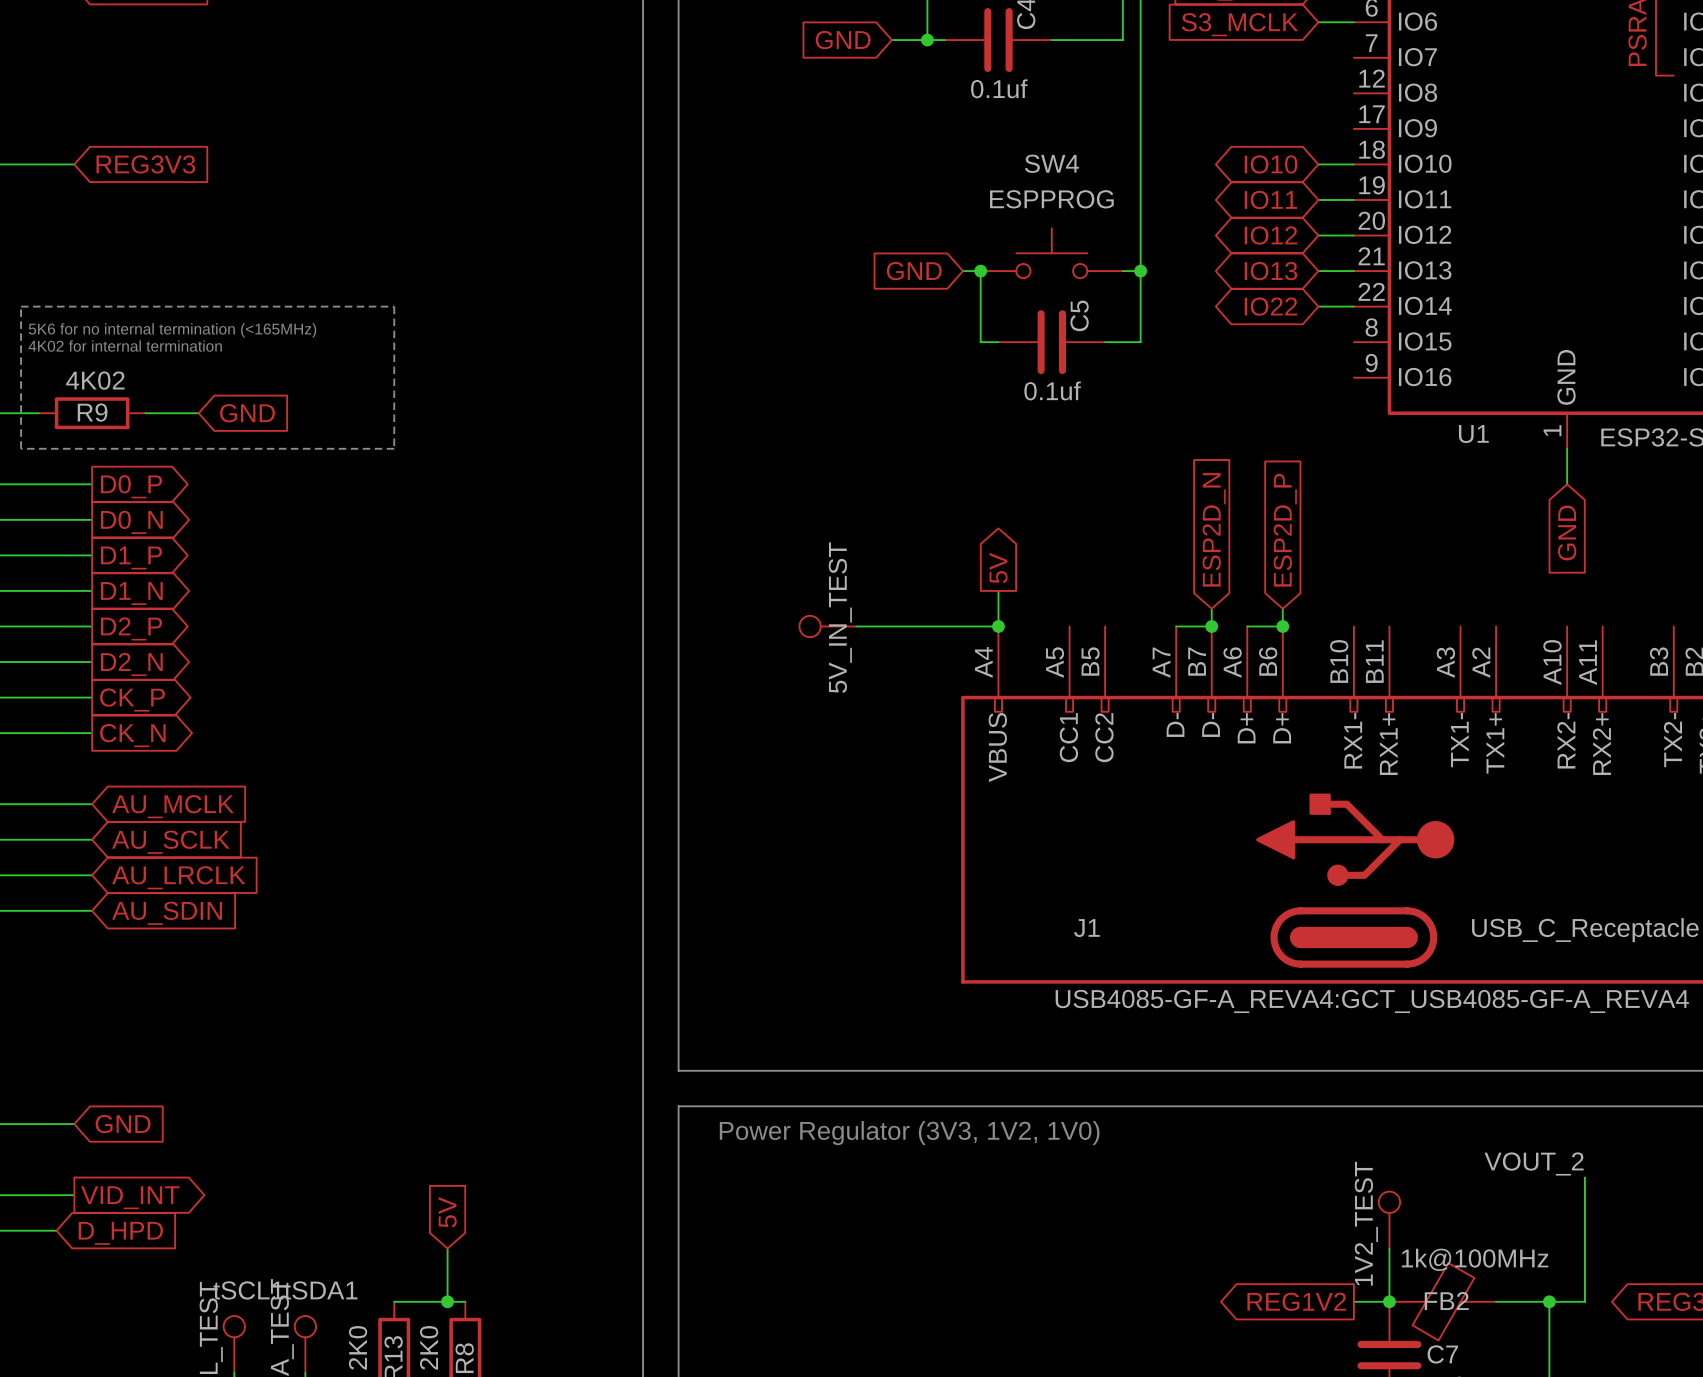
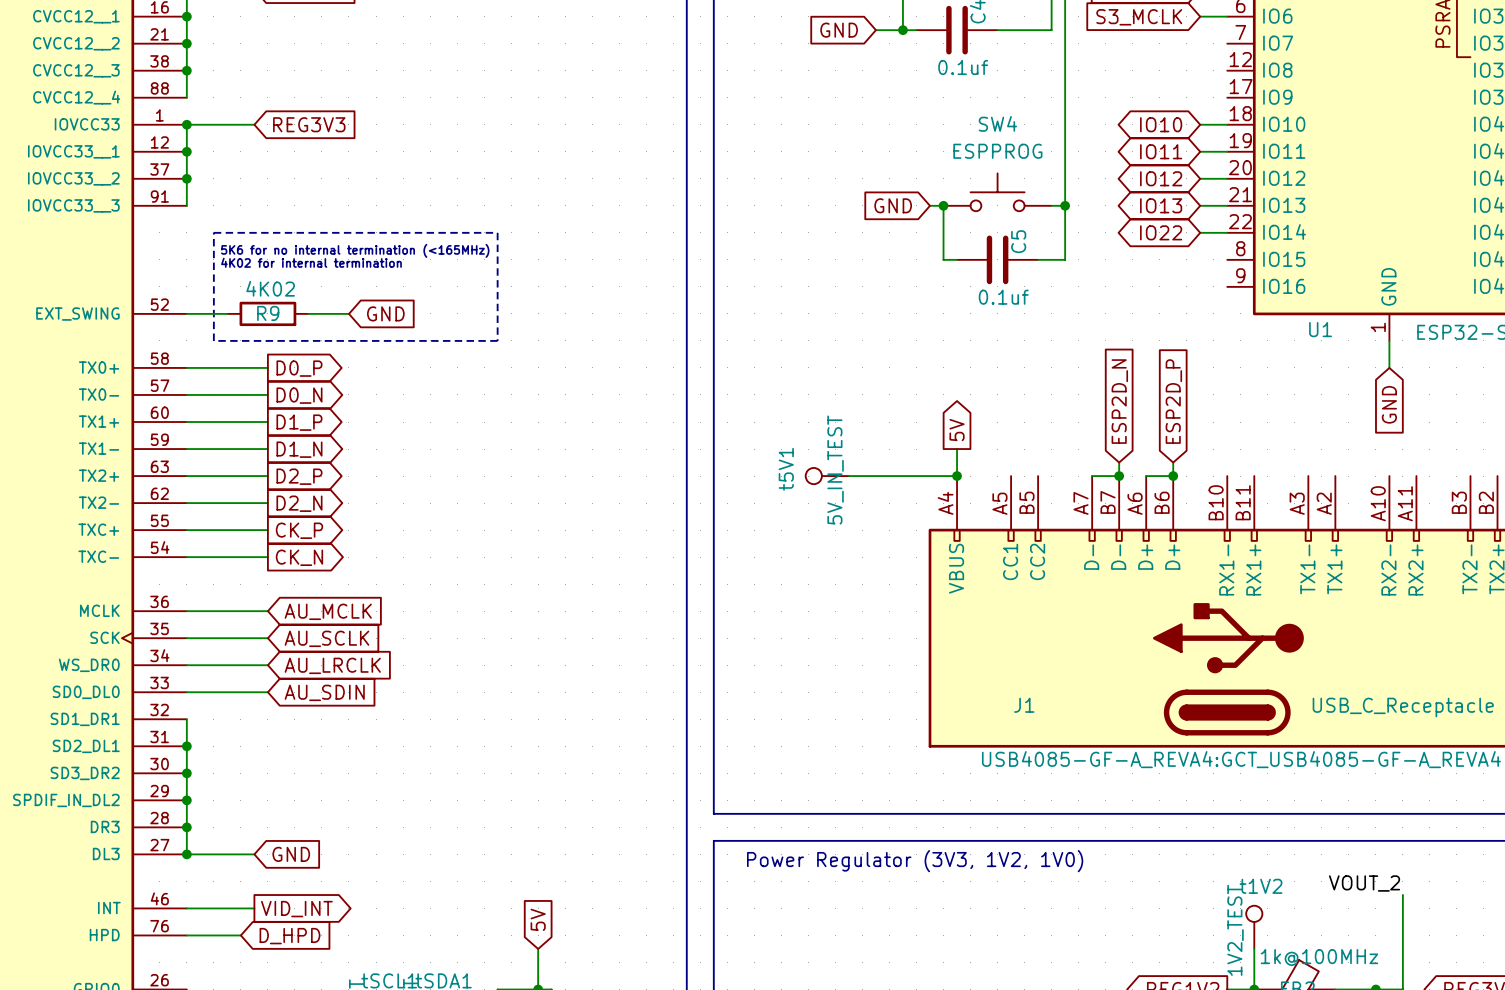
t5V1 name: none -> t5V1 (786, 469)
t1V2 name: none -> t1V2 (1261, 886)

